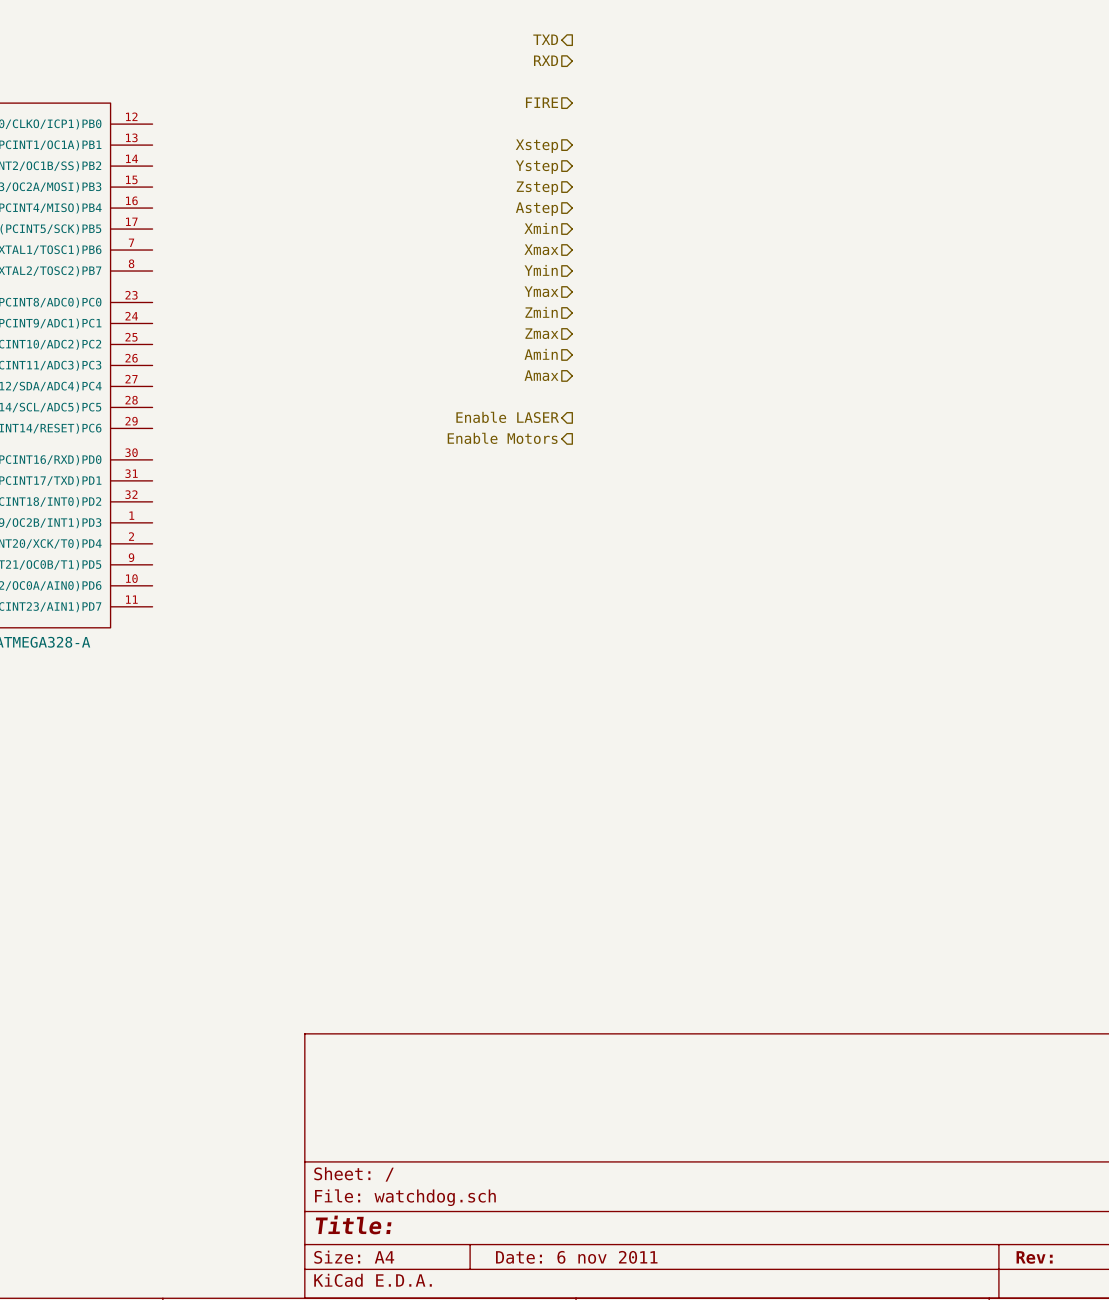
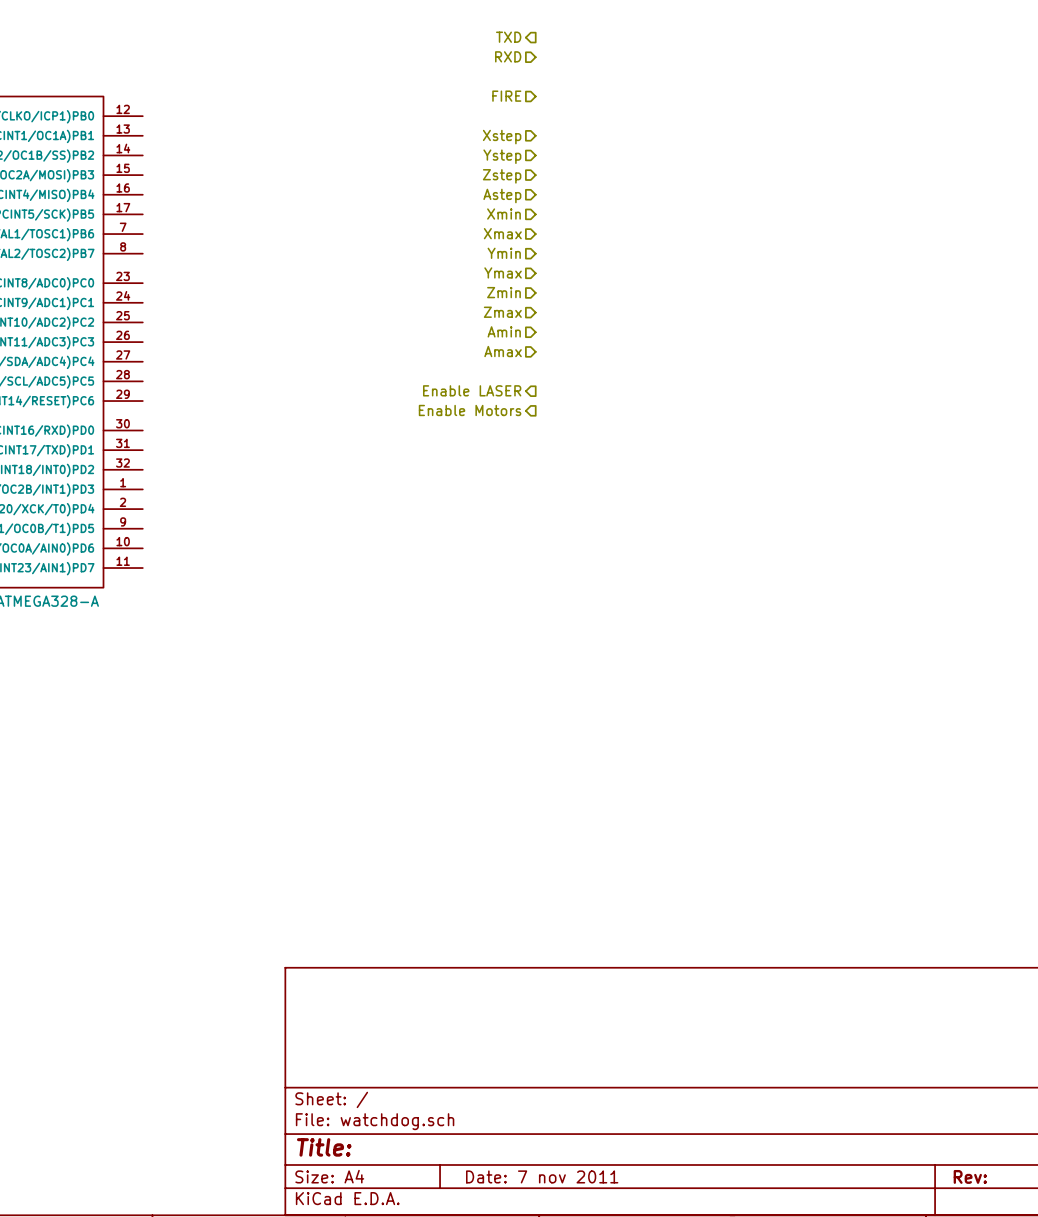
title block: Date: 6 nov 2011 (576, 1257) -> Date: 7 nov 2011 (542, 1176)

